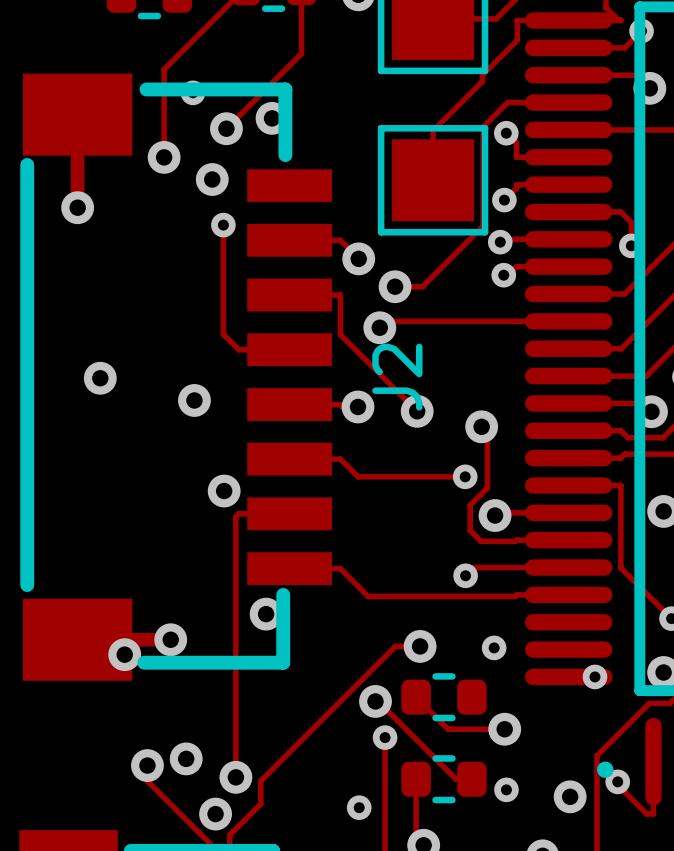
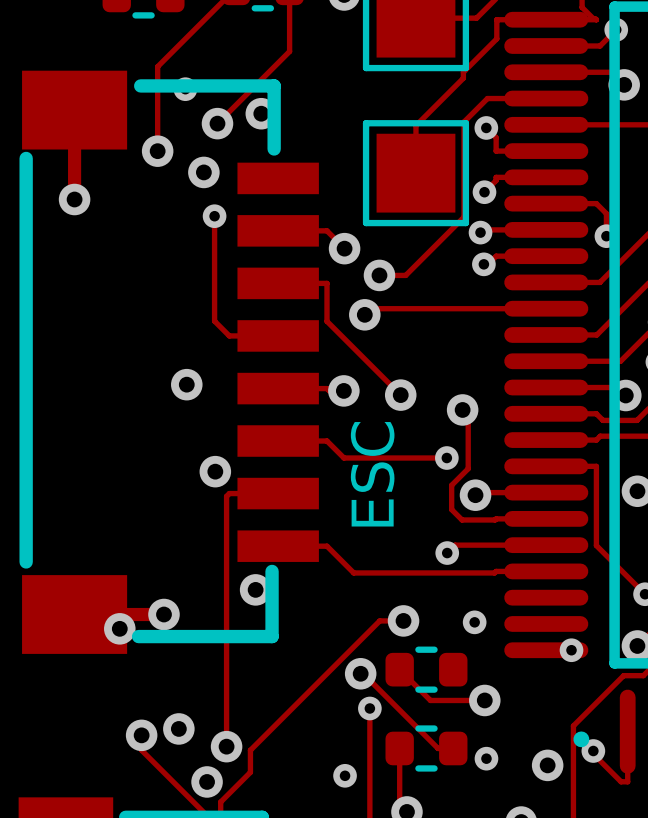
J2 name: J2 (397, 377) -> none
via: (100, 378) -> none
text: none -> ESC (372, 474)

